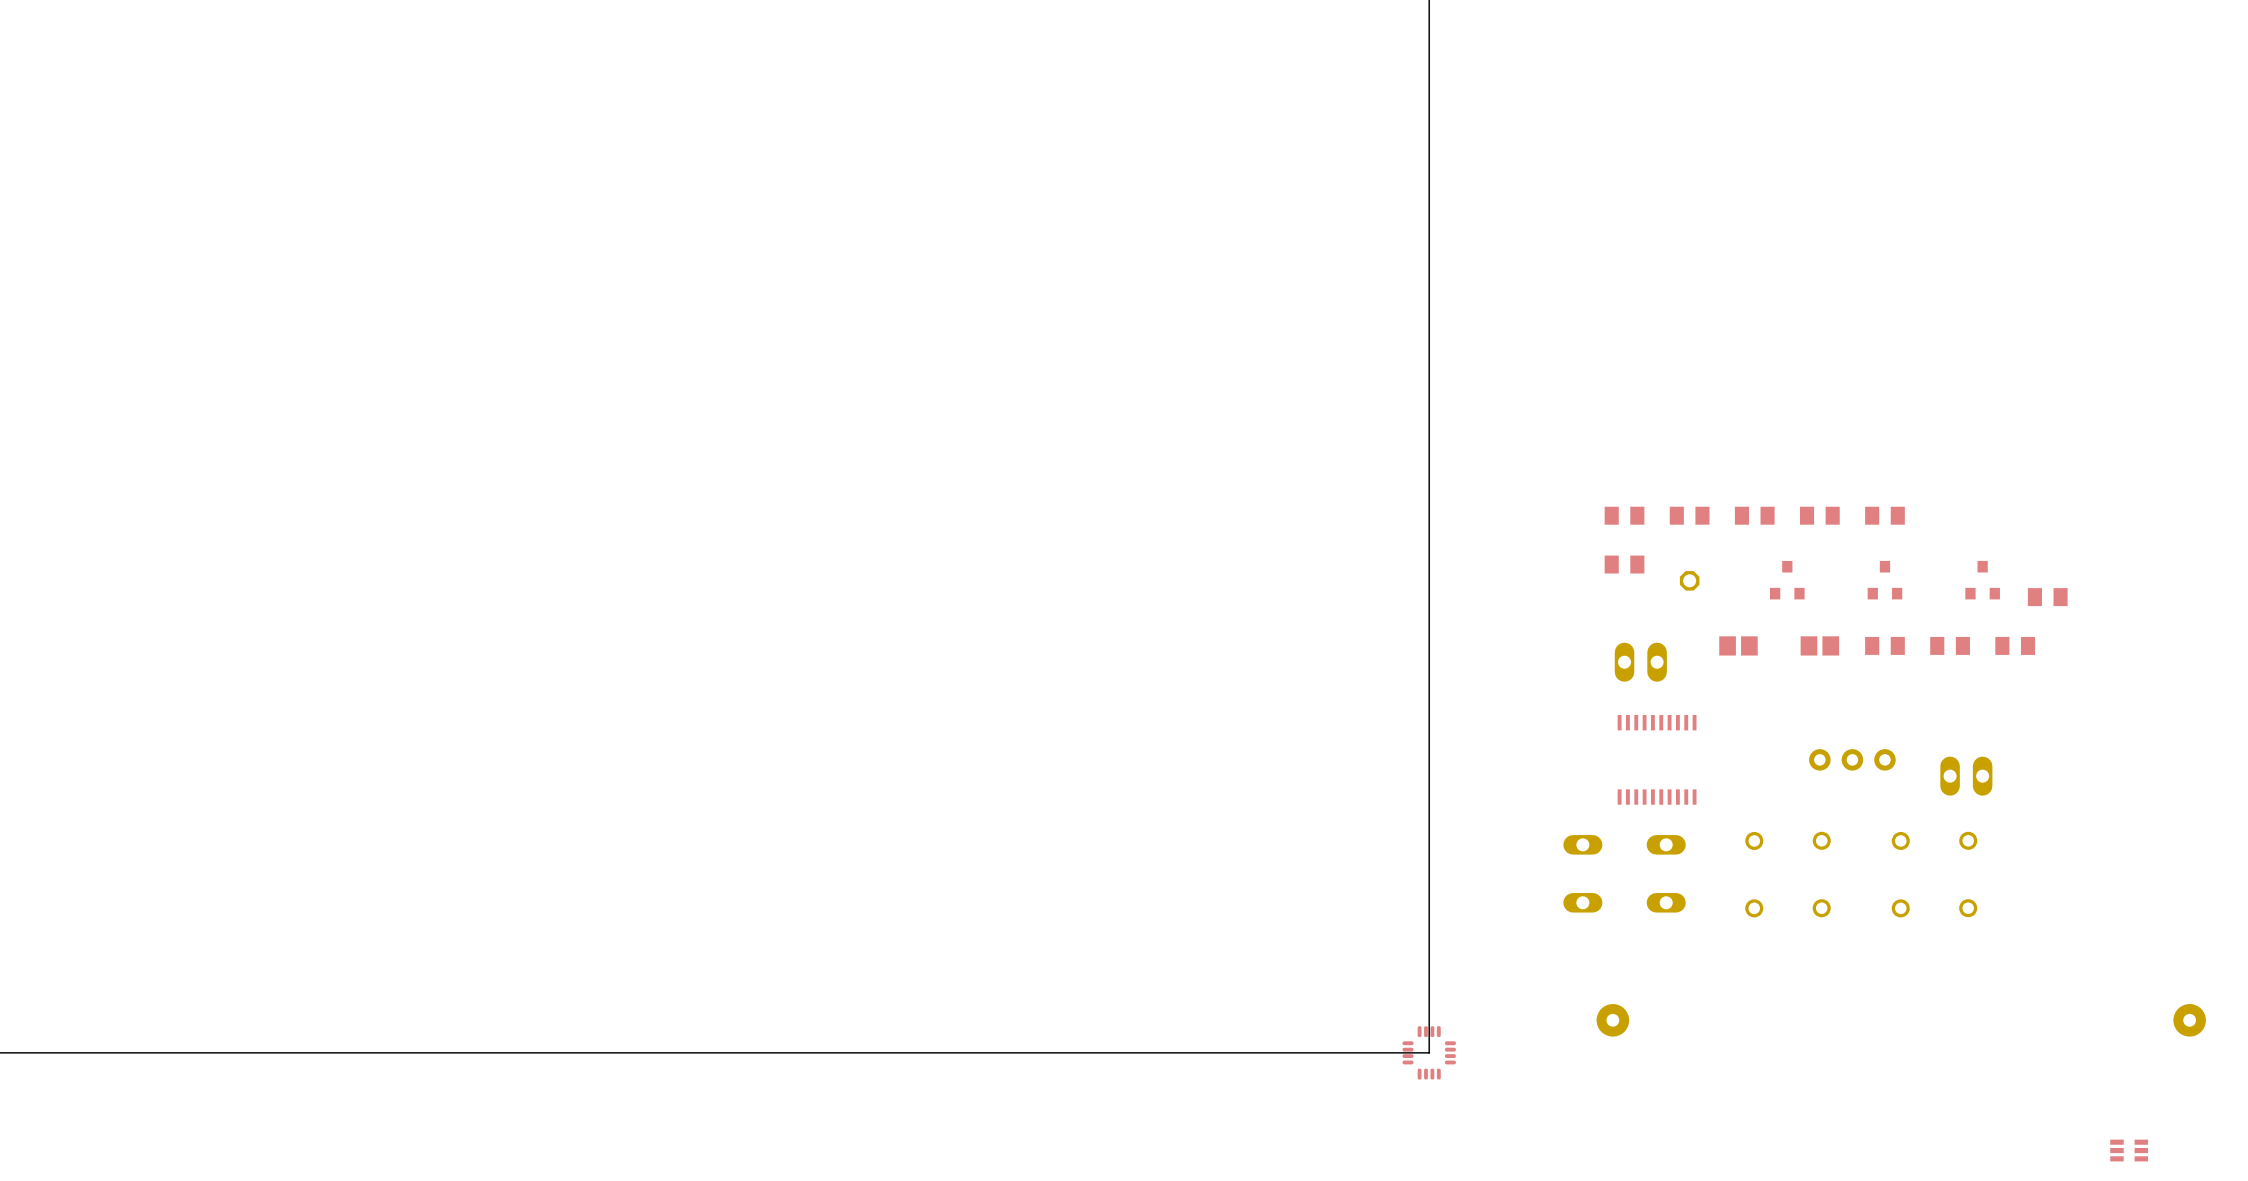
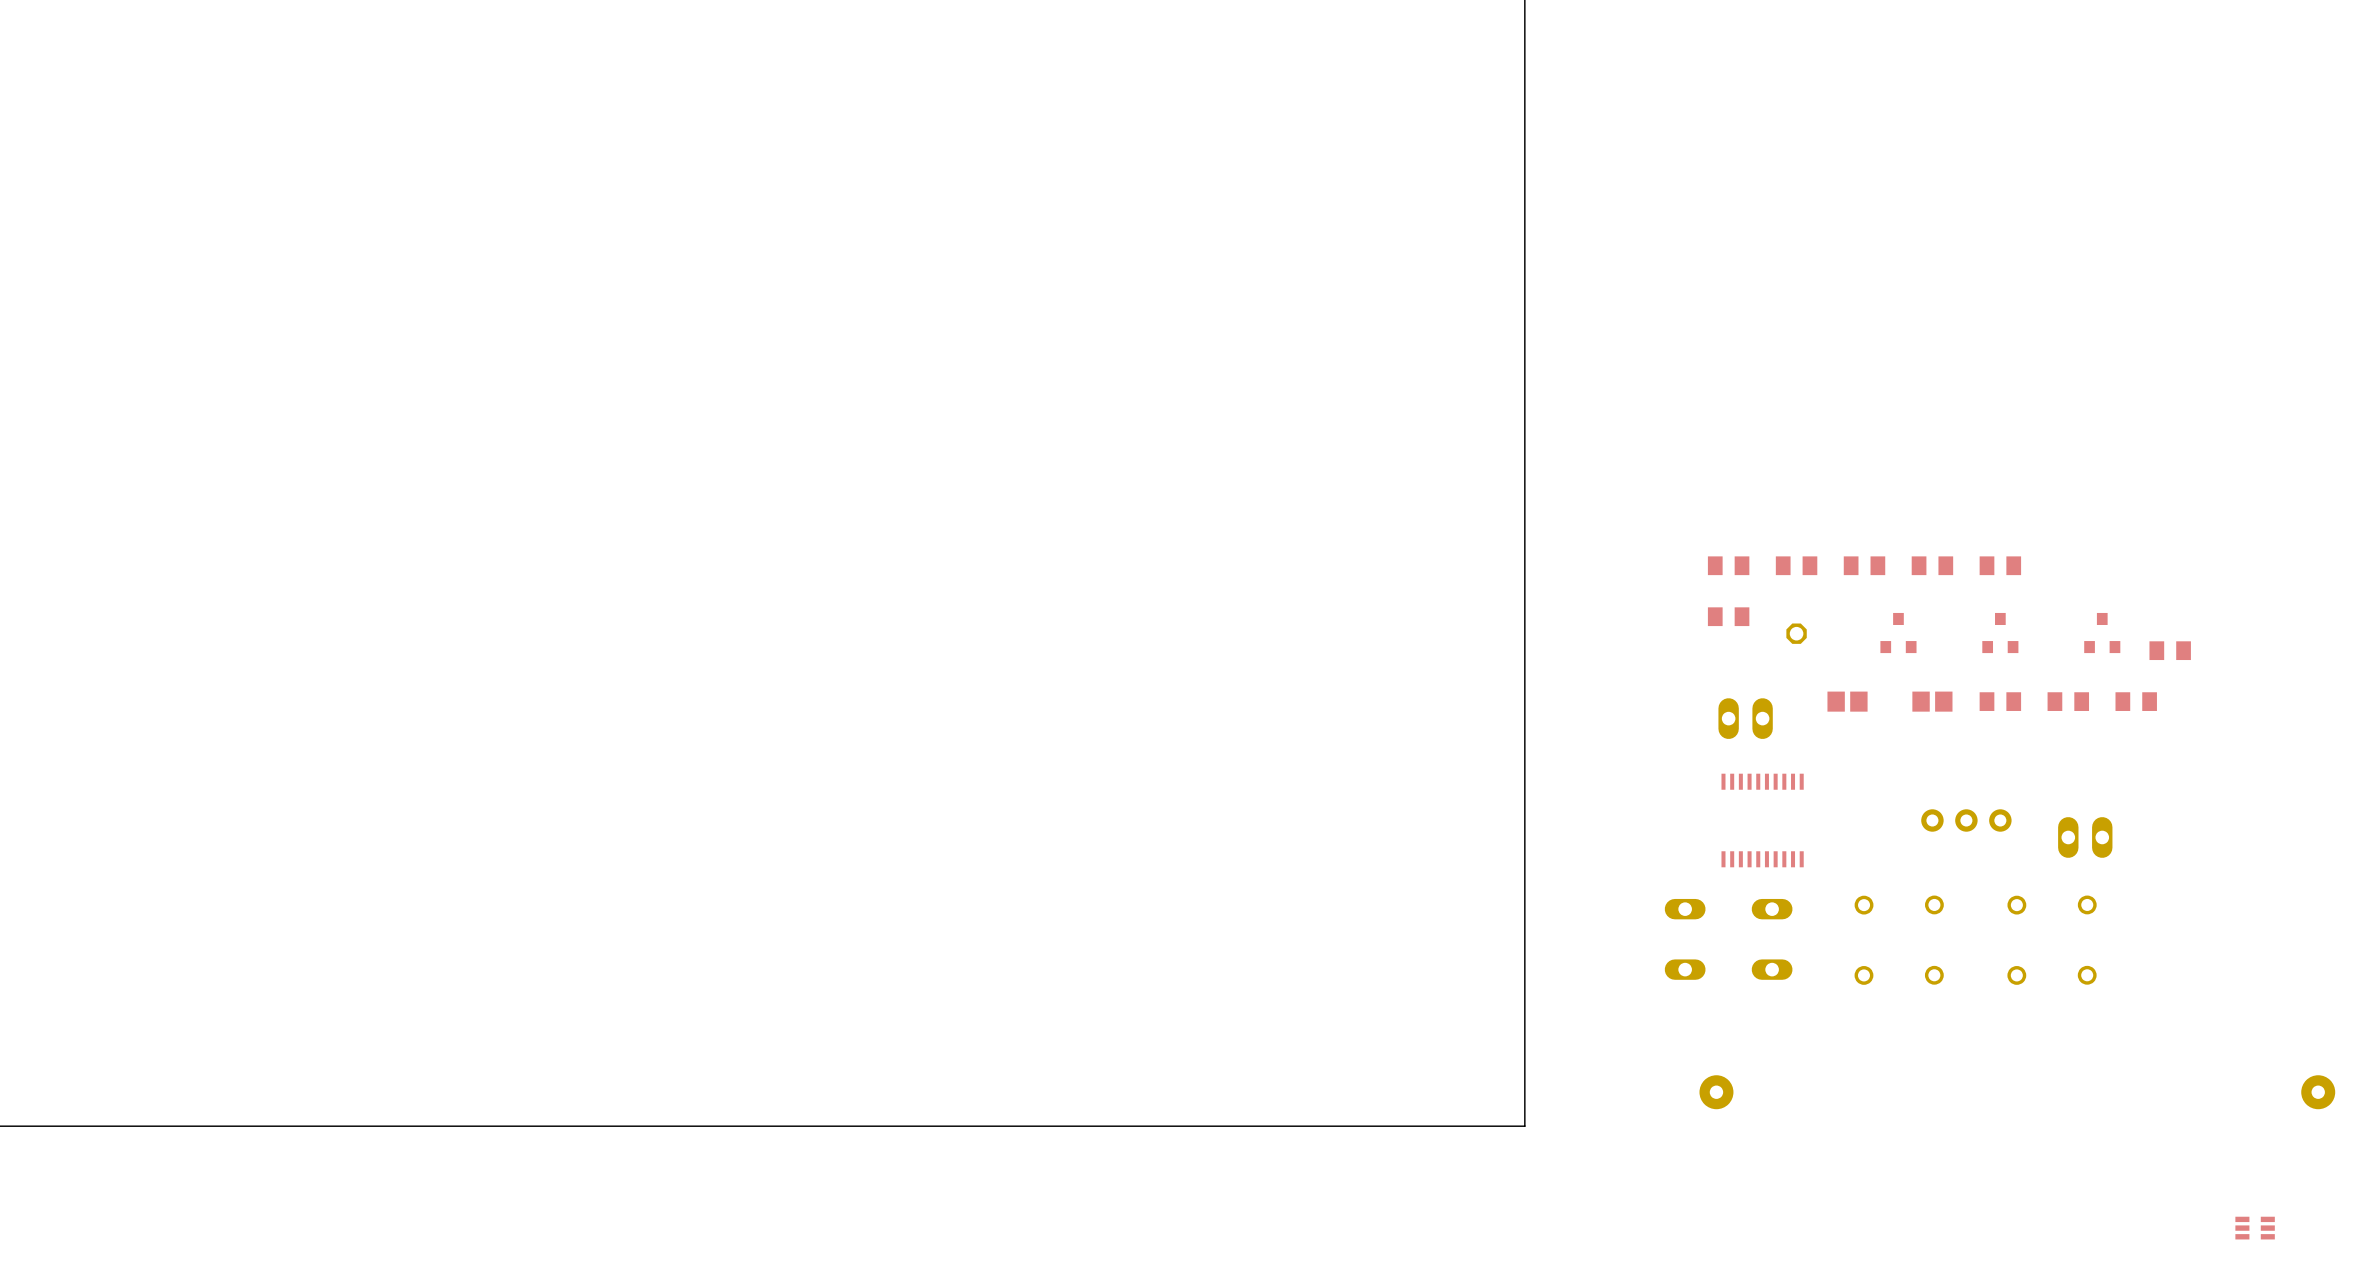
part: (1429, 1052) -> none

